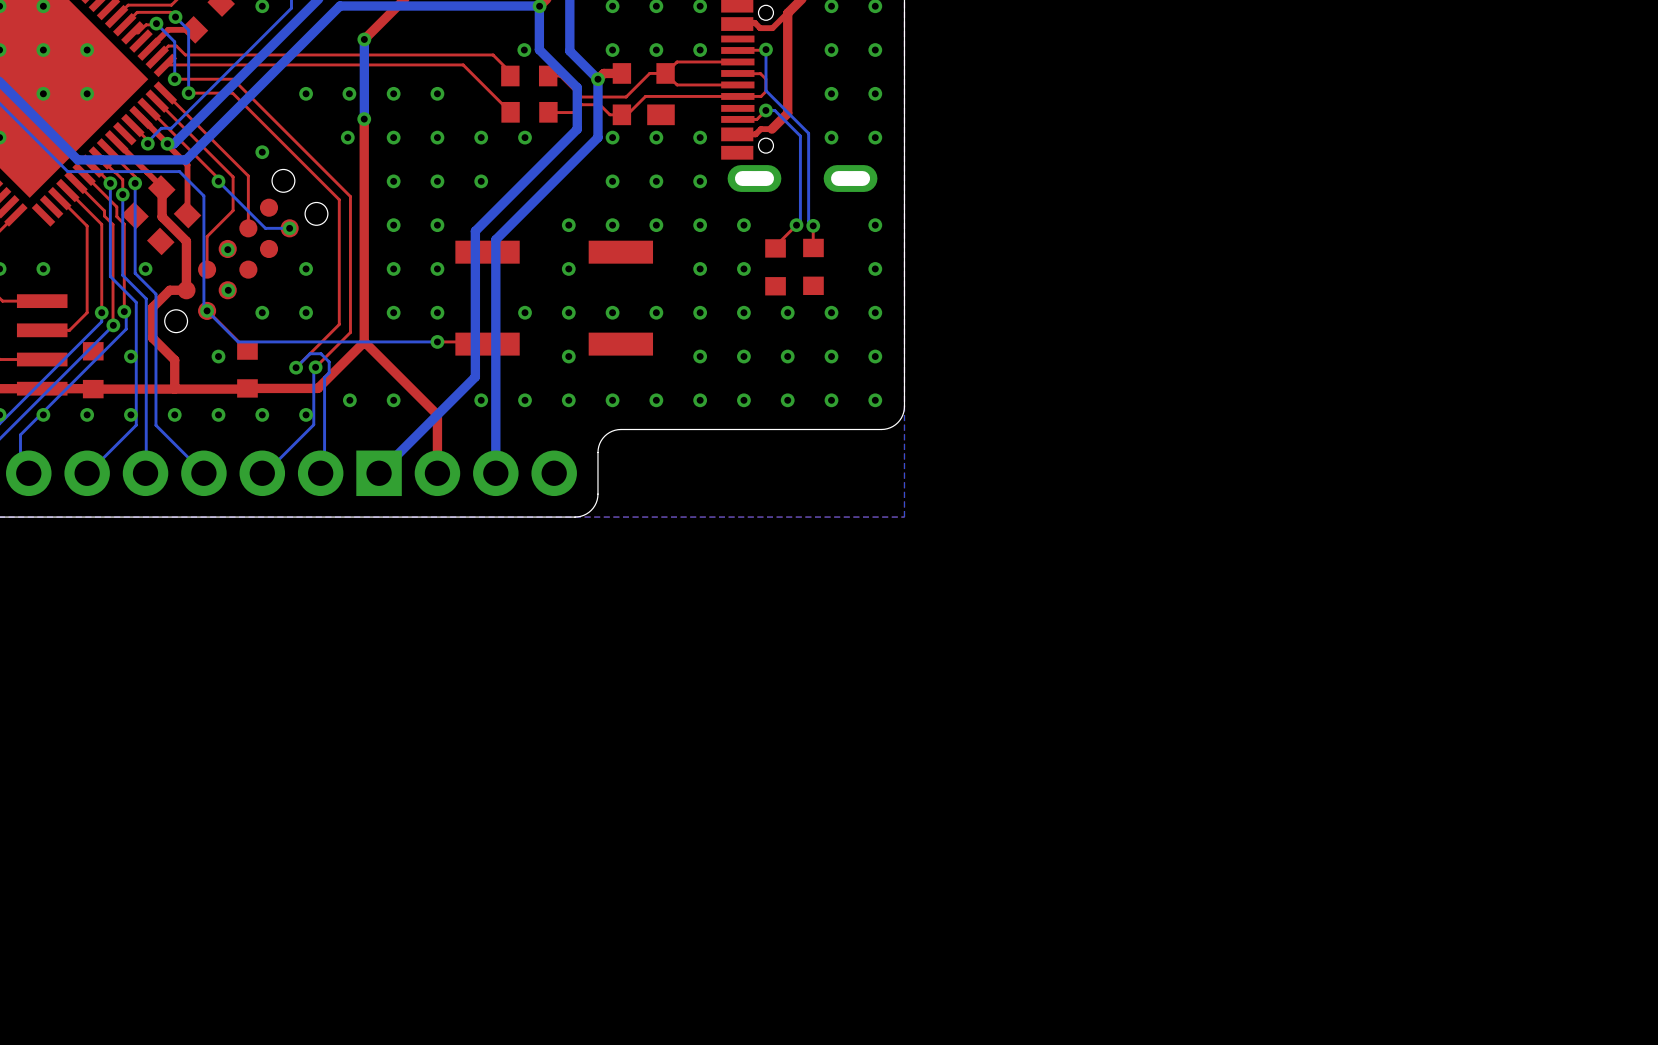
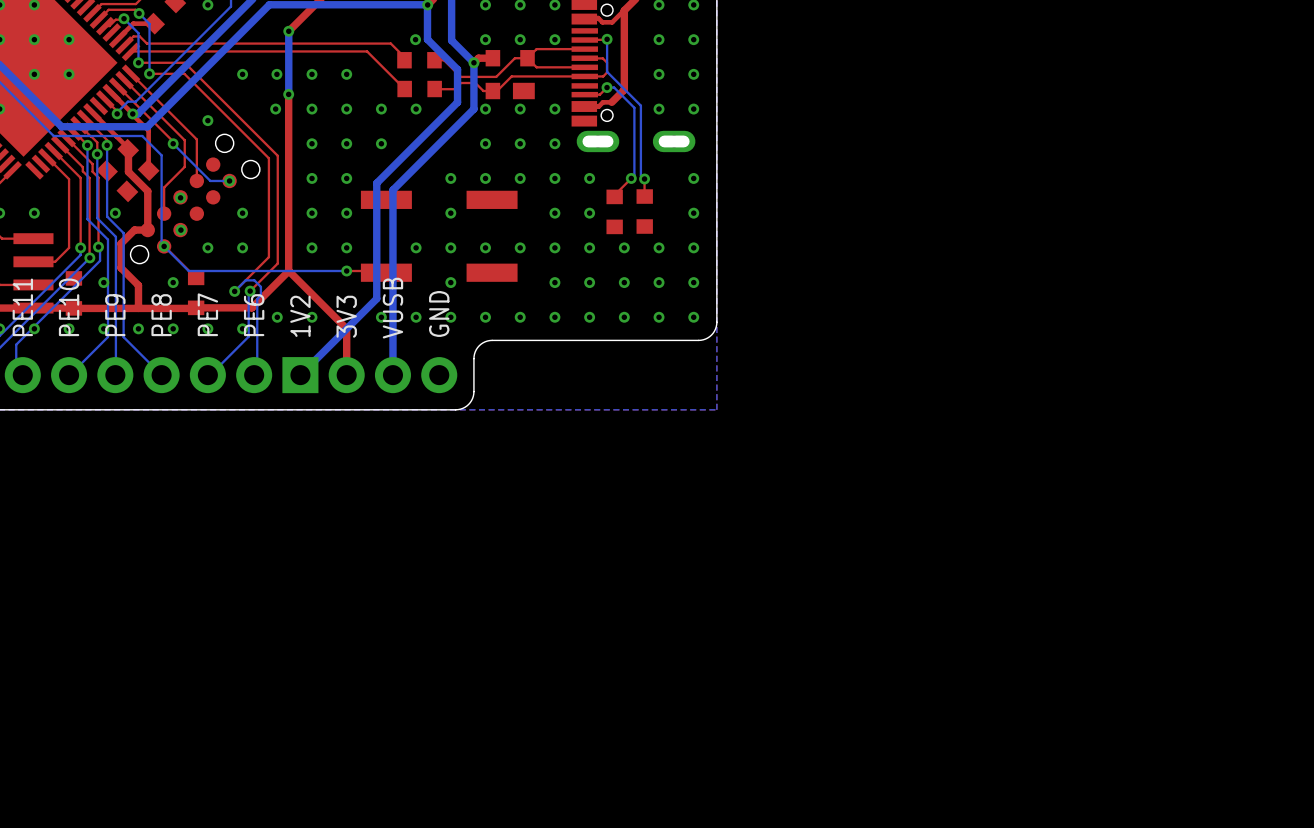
text: none -> PE11 (22, 307)
text: none -> PE10 (69, 307)
text: none -> VUSB (392, 308)
text: none -> GND (439, 313)
text: none -> PE9 (115, 315)
text: none -> PE8 (161, 315)
text: none -> PE7 (207, 314)
text: none -> PE6 (254, 315)
text: none -> 1V2 (300, 316)
text: none -> 3V3 (346, 316)

